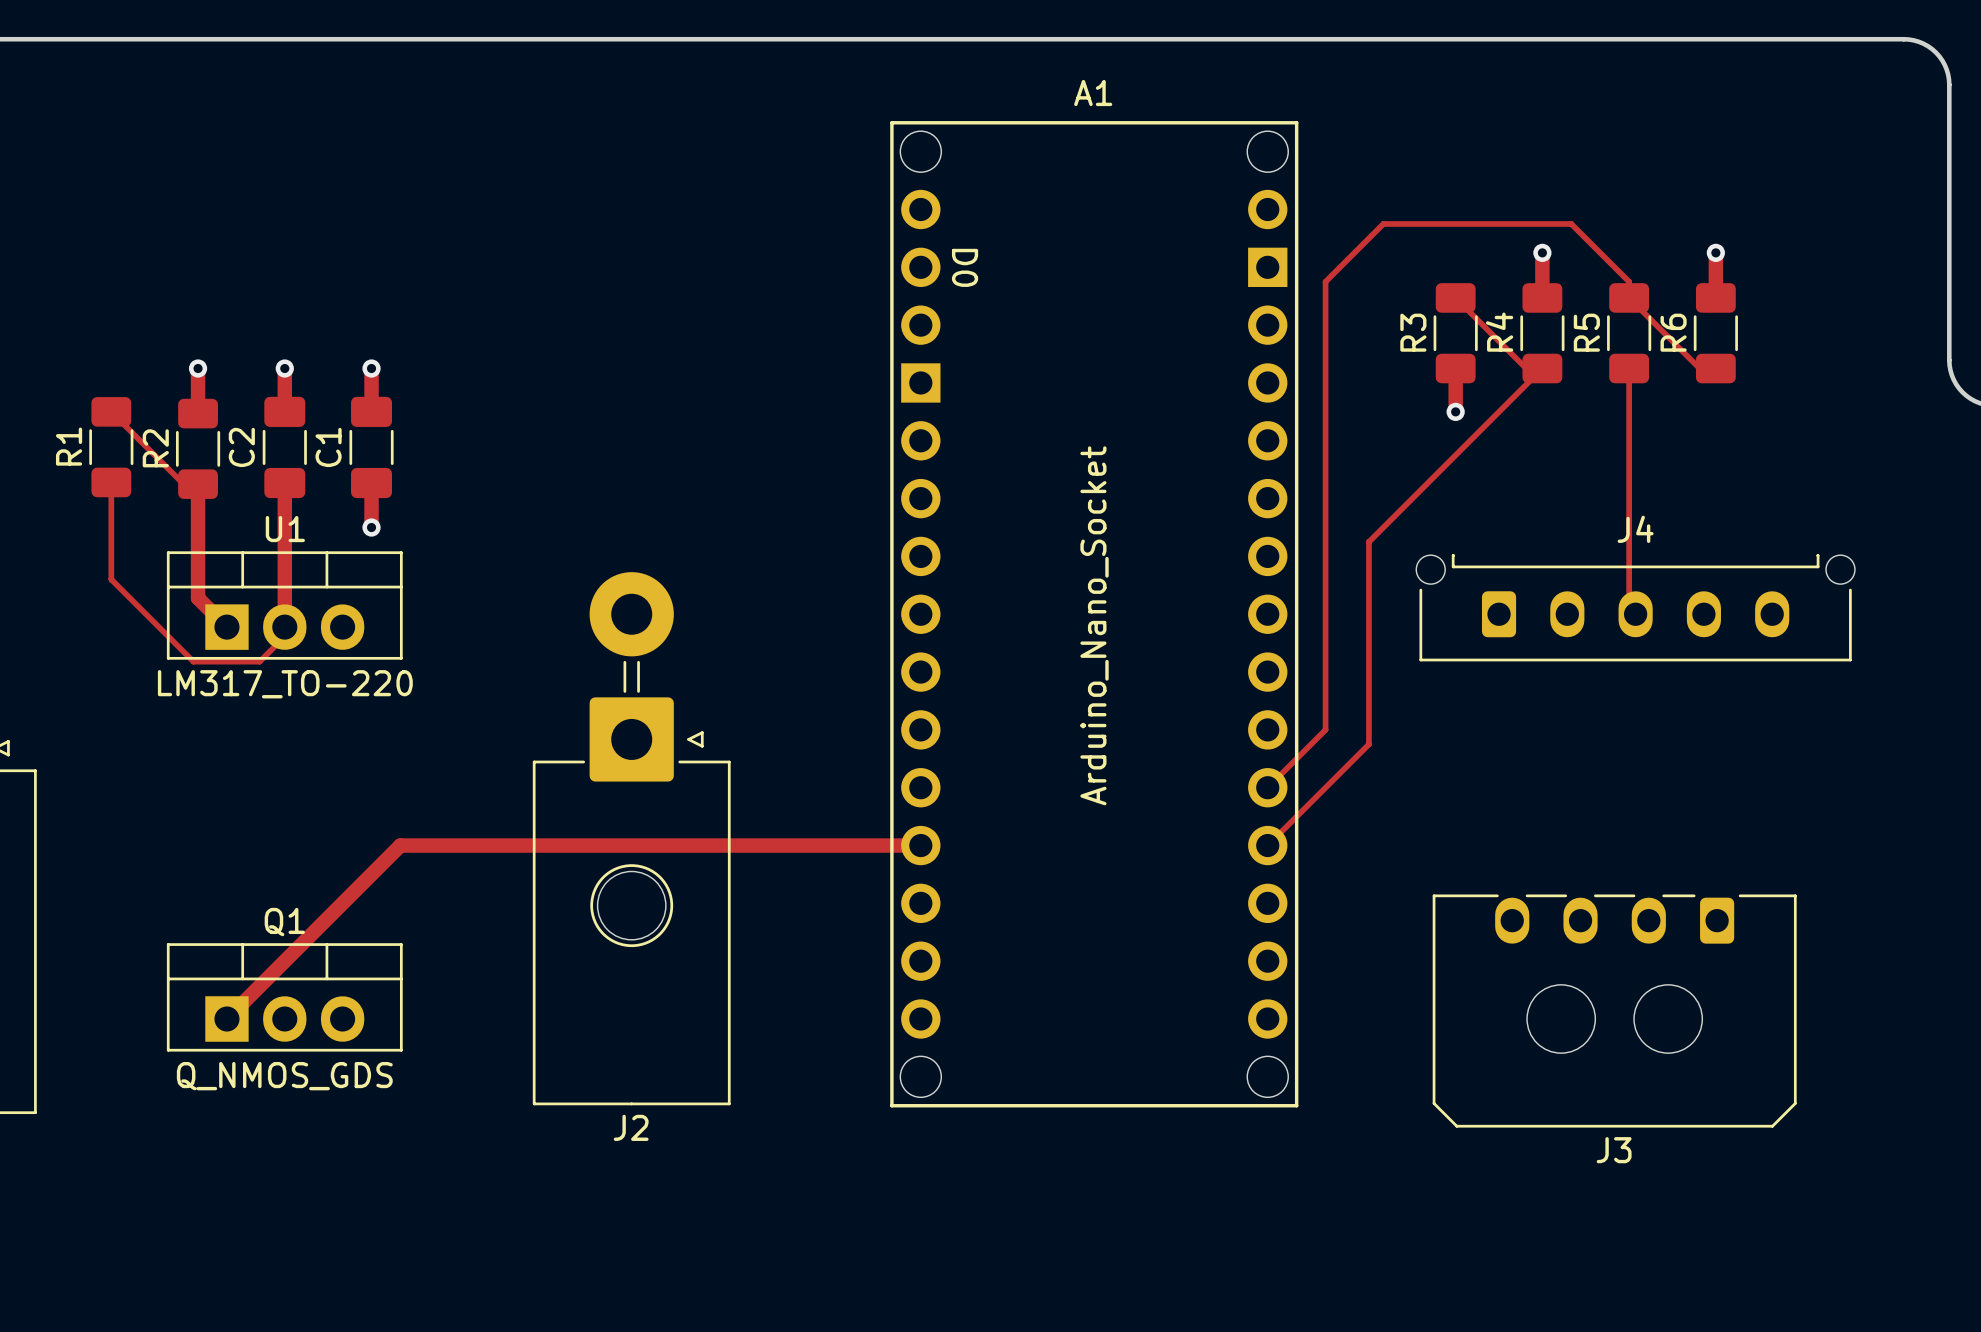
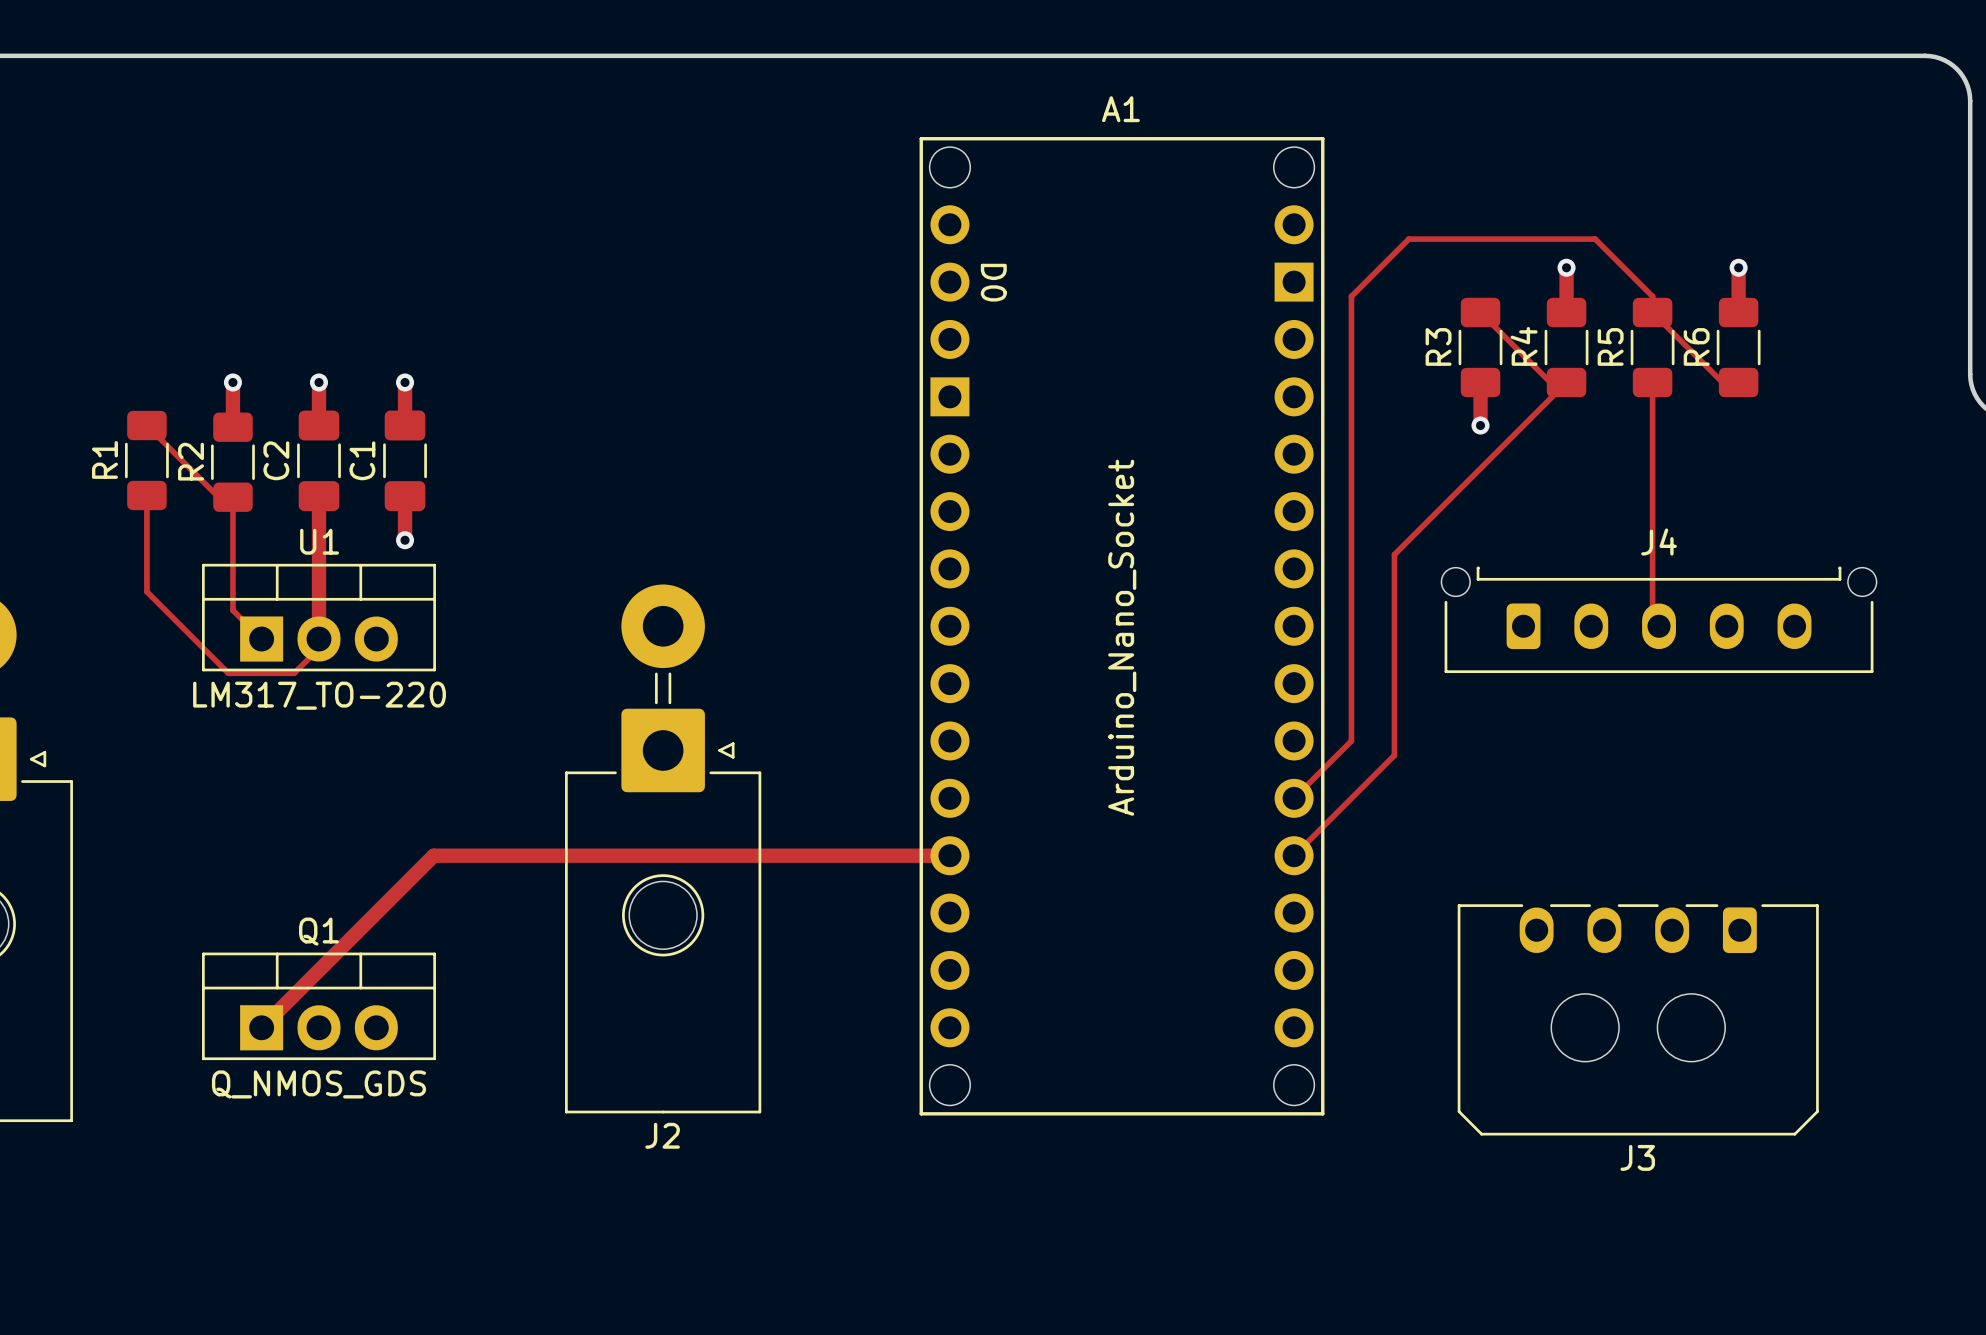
track width: thick (198, 484) (198, 598) (226, 627) -> thin (232, 497) (232, 610) (261, 639)

